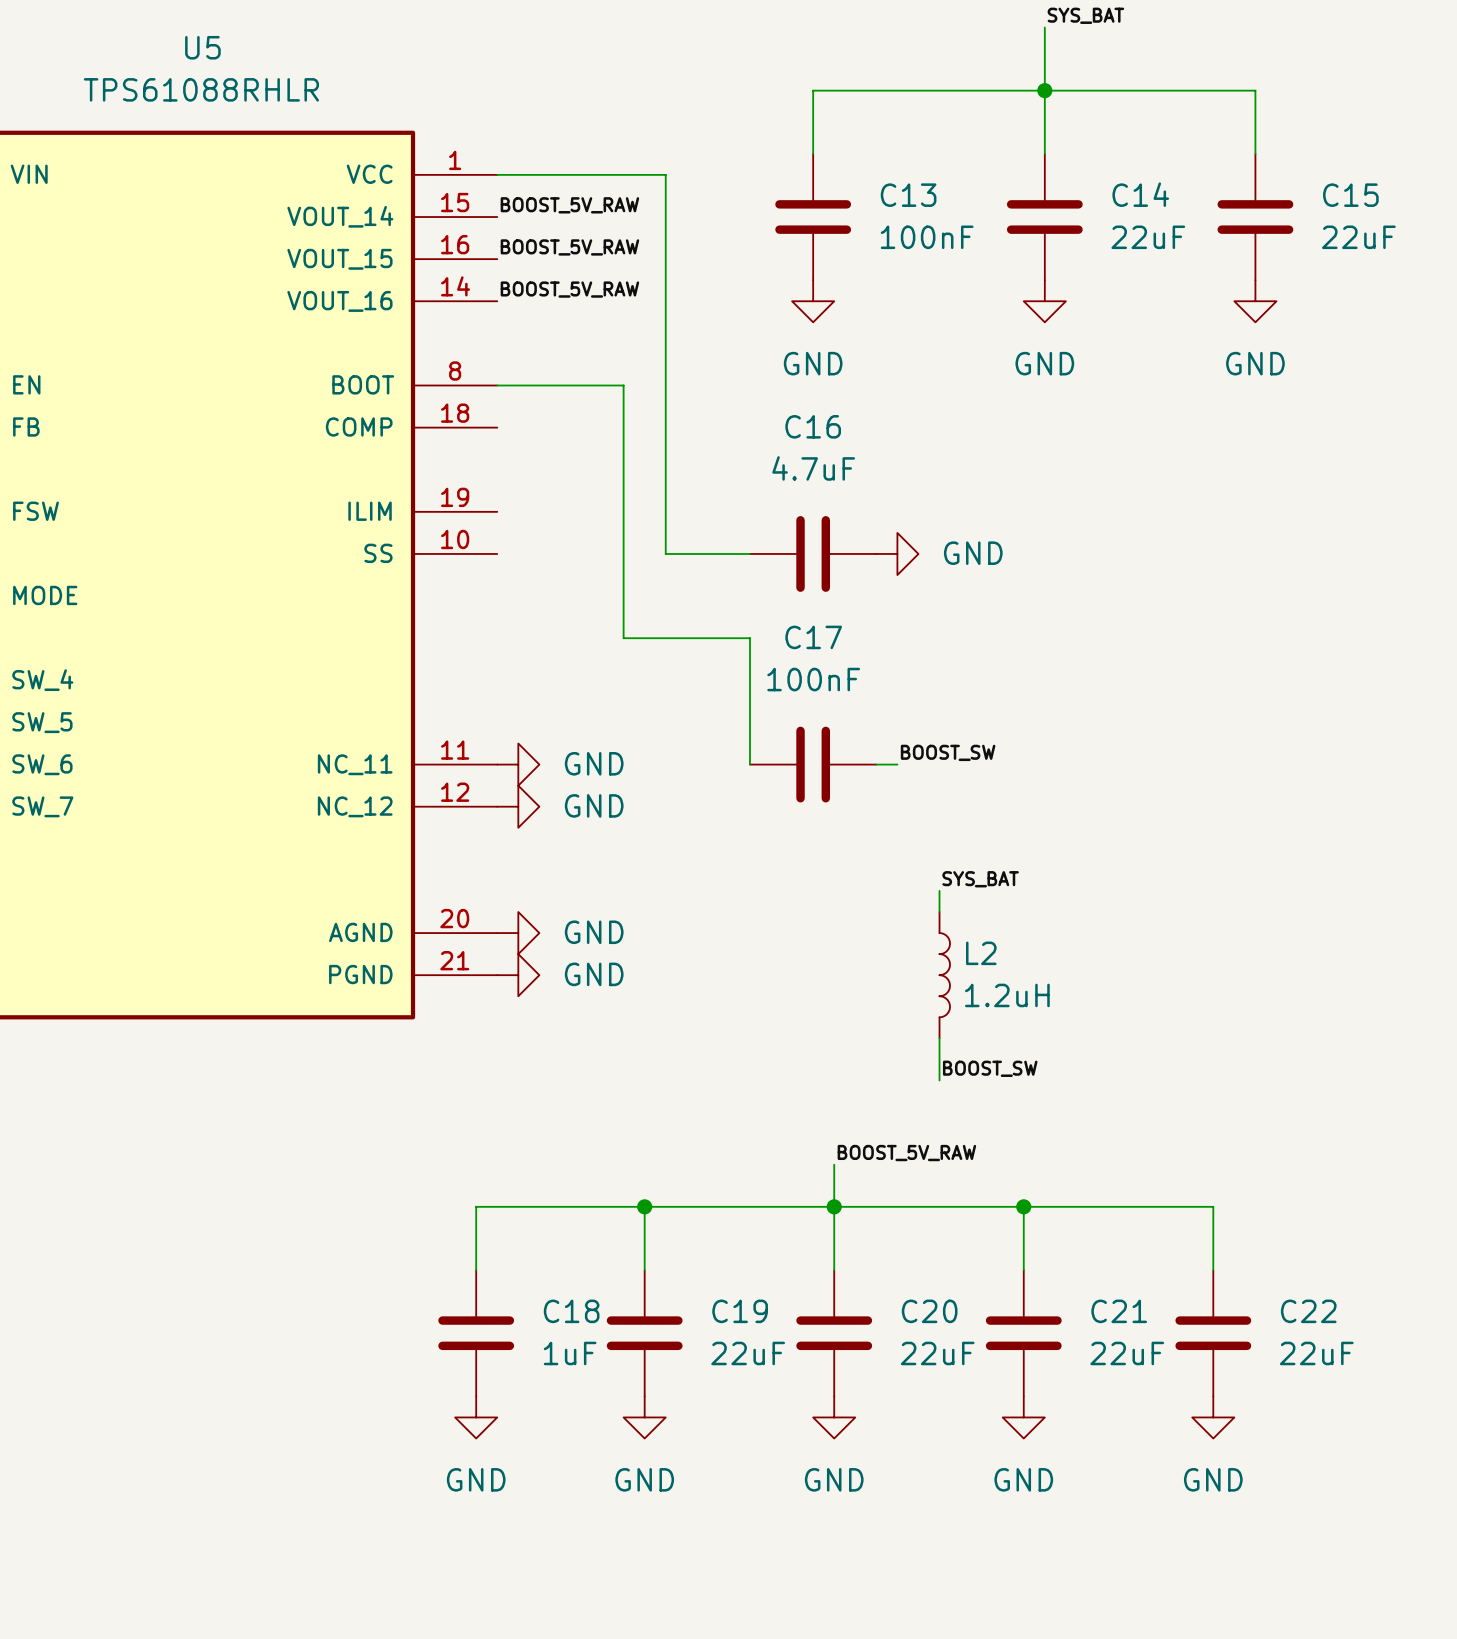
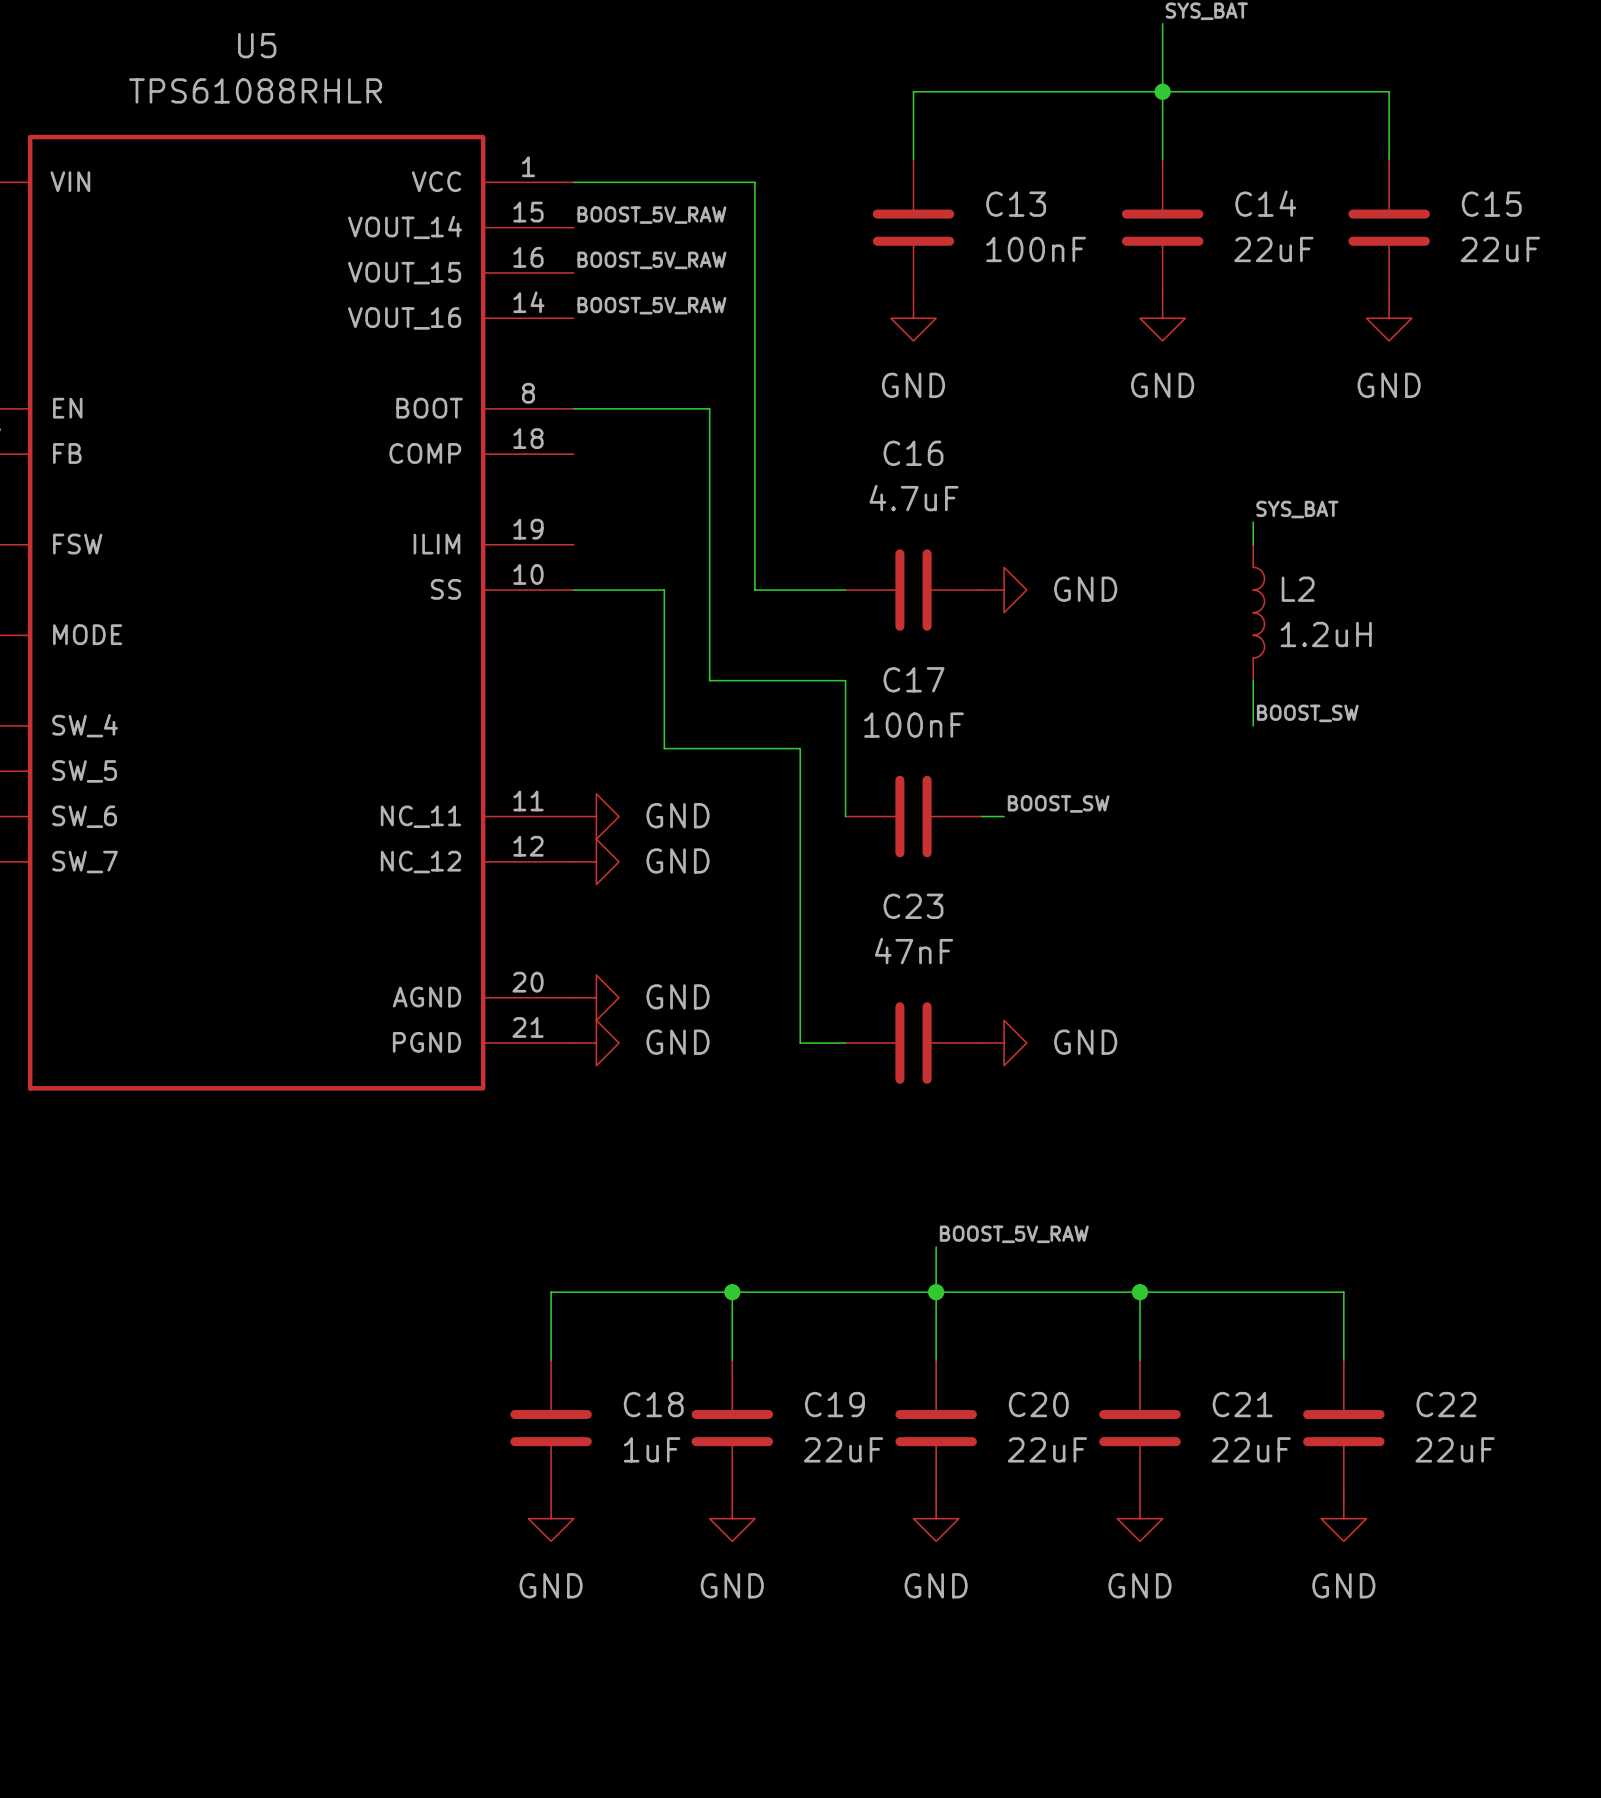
label: none -> SYS_BAT (1297, 509)
wire: none -> (1253, 522) (1253, 544)
wire: none -> (573, 590) (664, 590) (664, 748) (800, 748) (800, 1043) (845, 1043)
wire: none -> (1253, 680) (1253, 725)
label: none -> BOOST_SW (1307, 713)
label: SYS_BAT (980, 879) -> none
wire: (939, 890) (939, 912) -> none
C23: none -> 47nF (913, 1043)
power symbol: none -> GND (1004, 1043)
L2 position: (944, 975) -> (1258, 612)
wire: (939, 1038) (939, 1080) -> none
label: BOOST_SW (990, 1068) -> none

